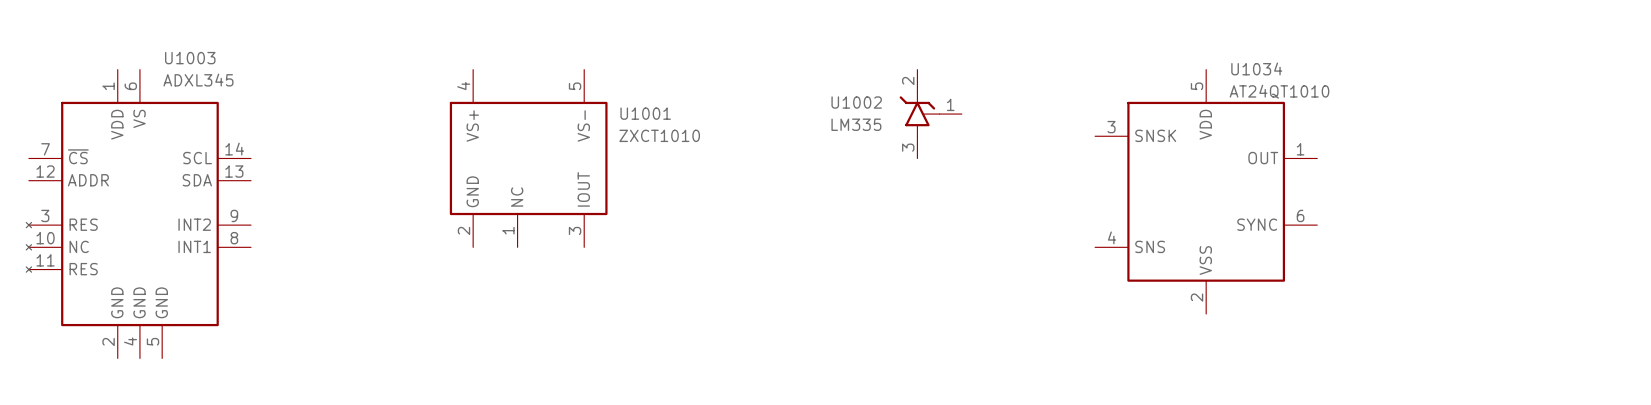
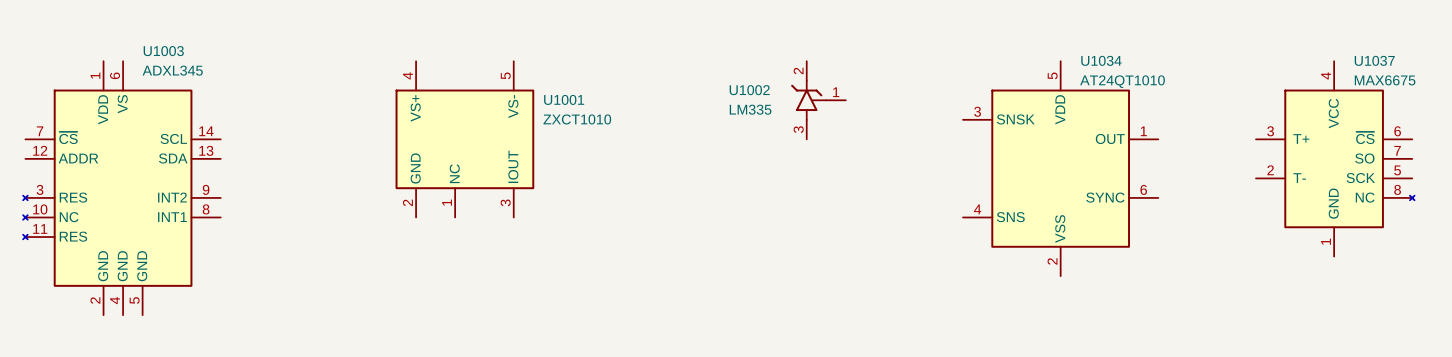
U1037: none -> MAX6675 (1335, 158)

